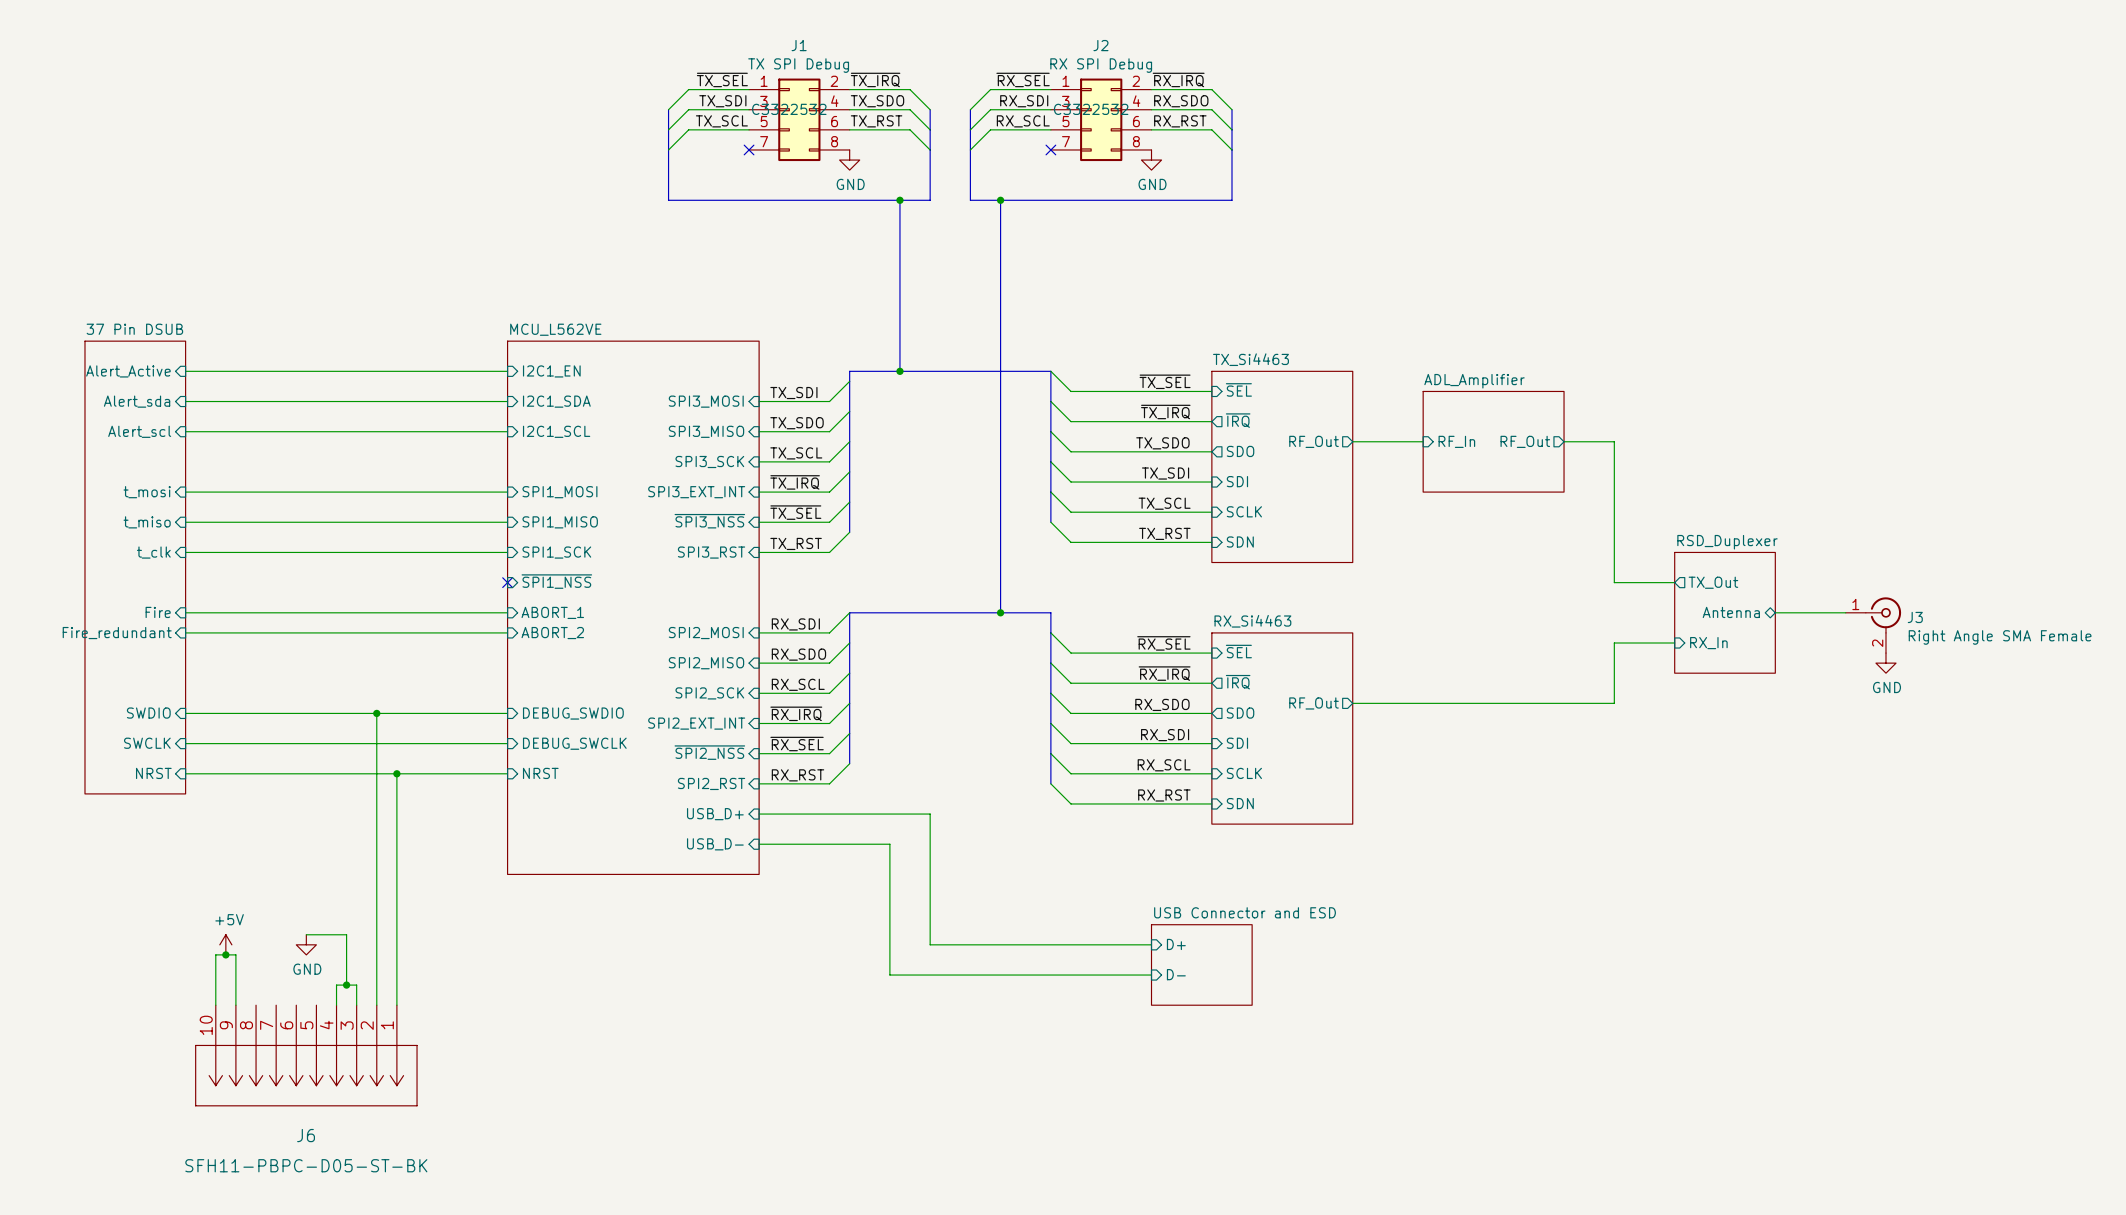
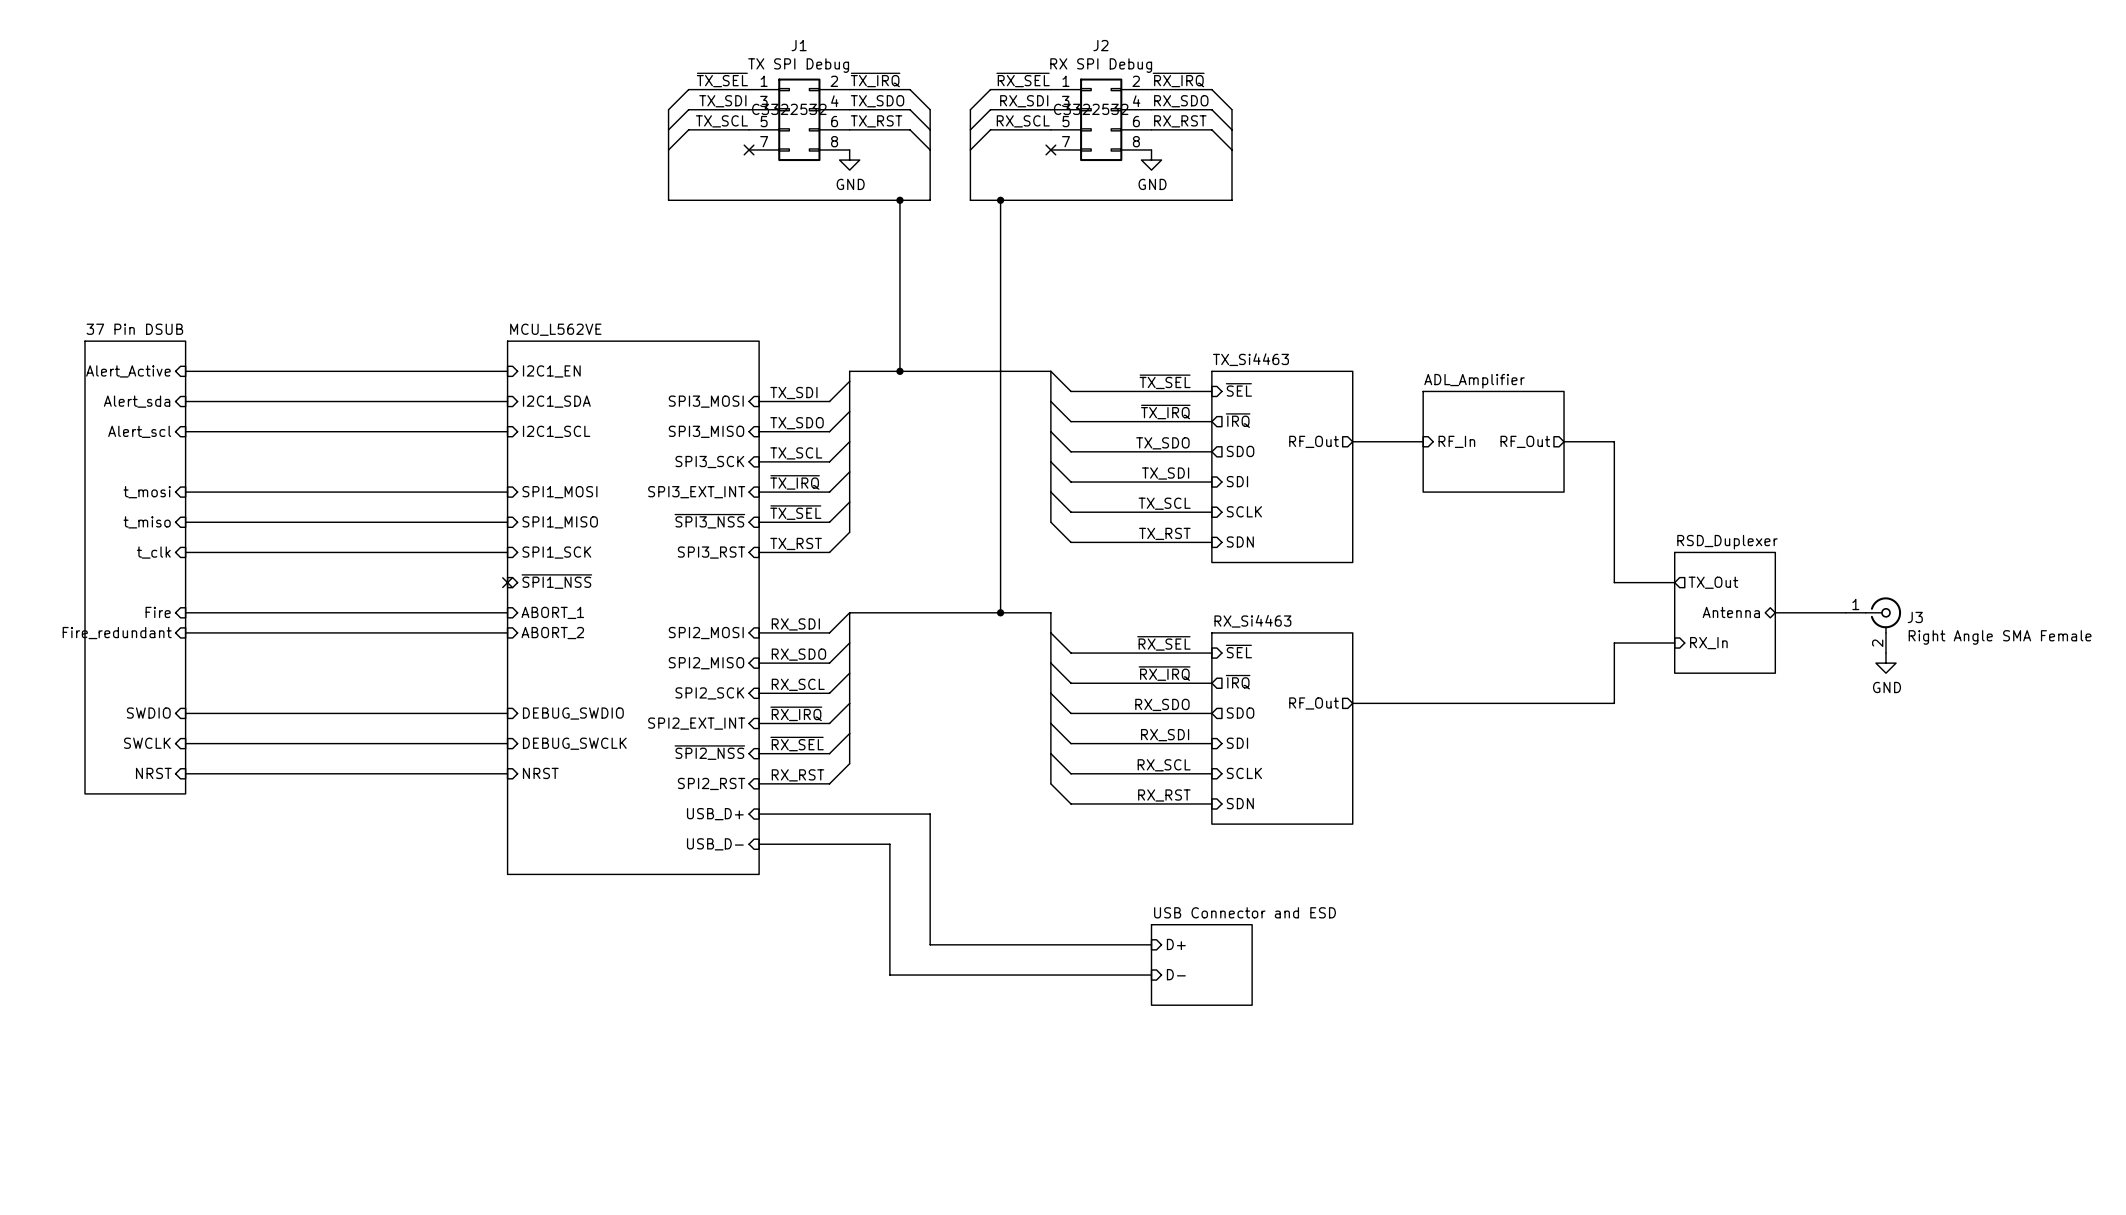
wire: (376, 713) (376, 1005) -> none
junction: (376, 713) -> none
wire: (396, 773) (396, 1005) -> none
junction: (396, 773) -> none
wire: (306, 934) (346, 934) (346, 985) -> none
power symbol: +5V (225, 944) -> none
power symbol: GND (306, 944) -> none
junction: (225, 954) -> none
junction: (346, 985) -> none
wire: (215, 1005) (215, 954) (235, 954) (235, 1005) -> none
wire: (336, 1005) (336, 985) (356, 985) (356, 1005) -> none
J6: SFH11-PBPC-D05-ST-BK (306, 1055) -> none

